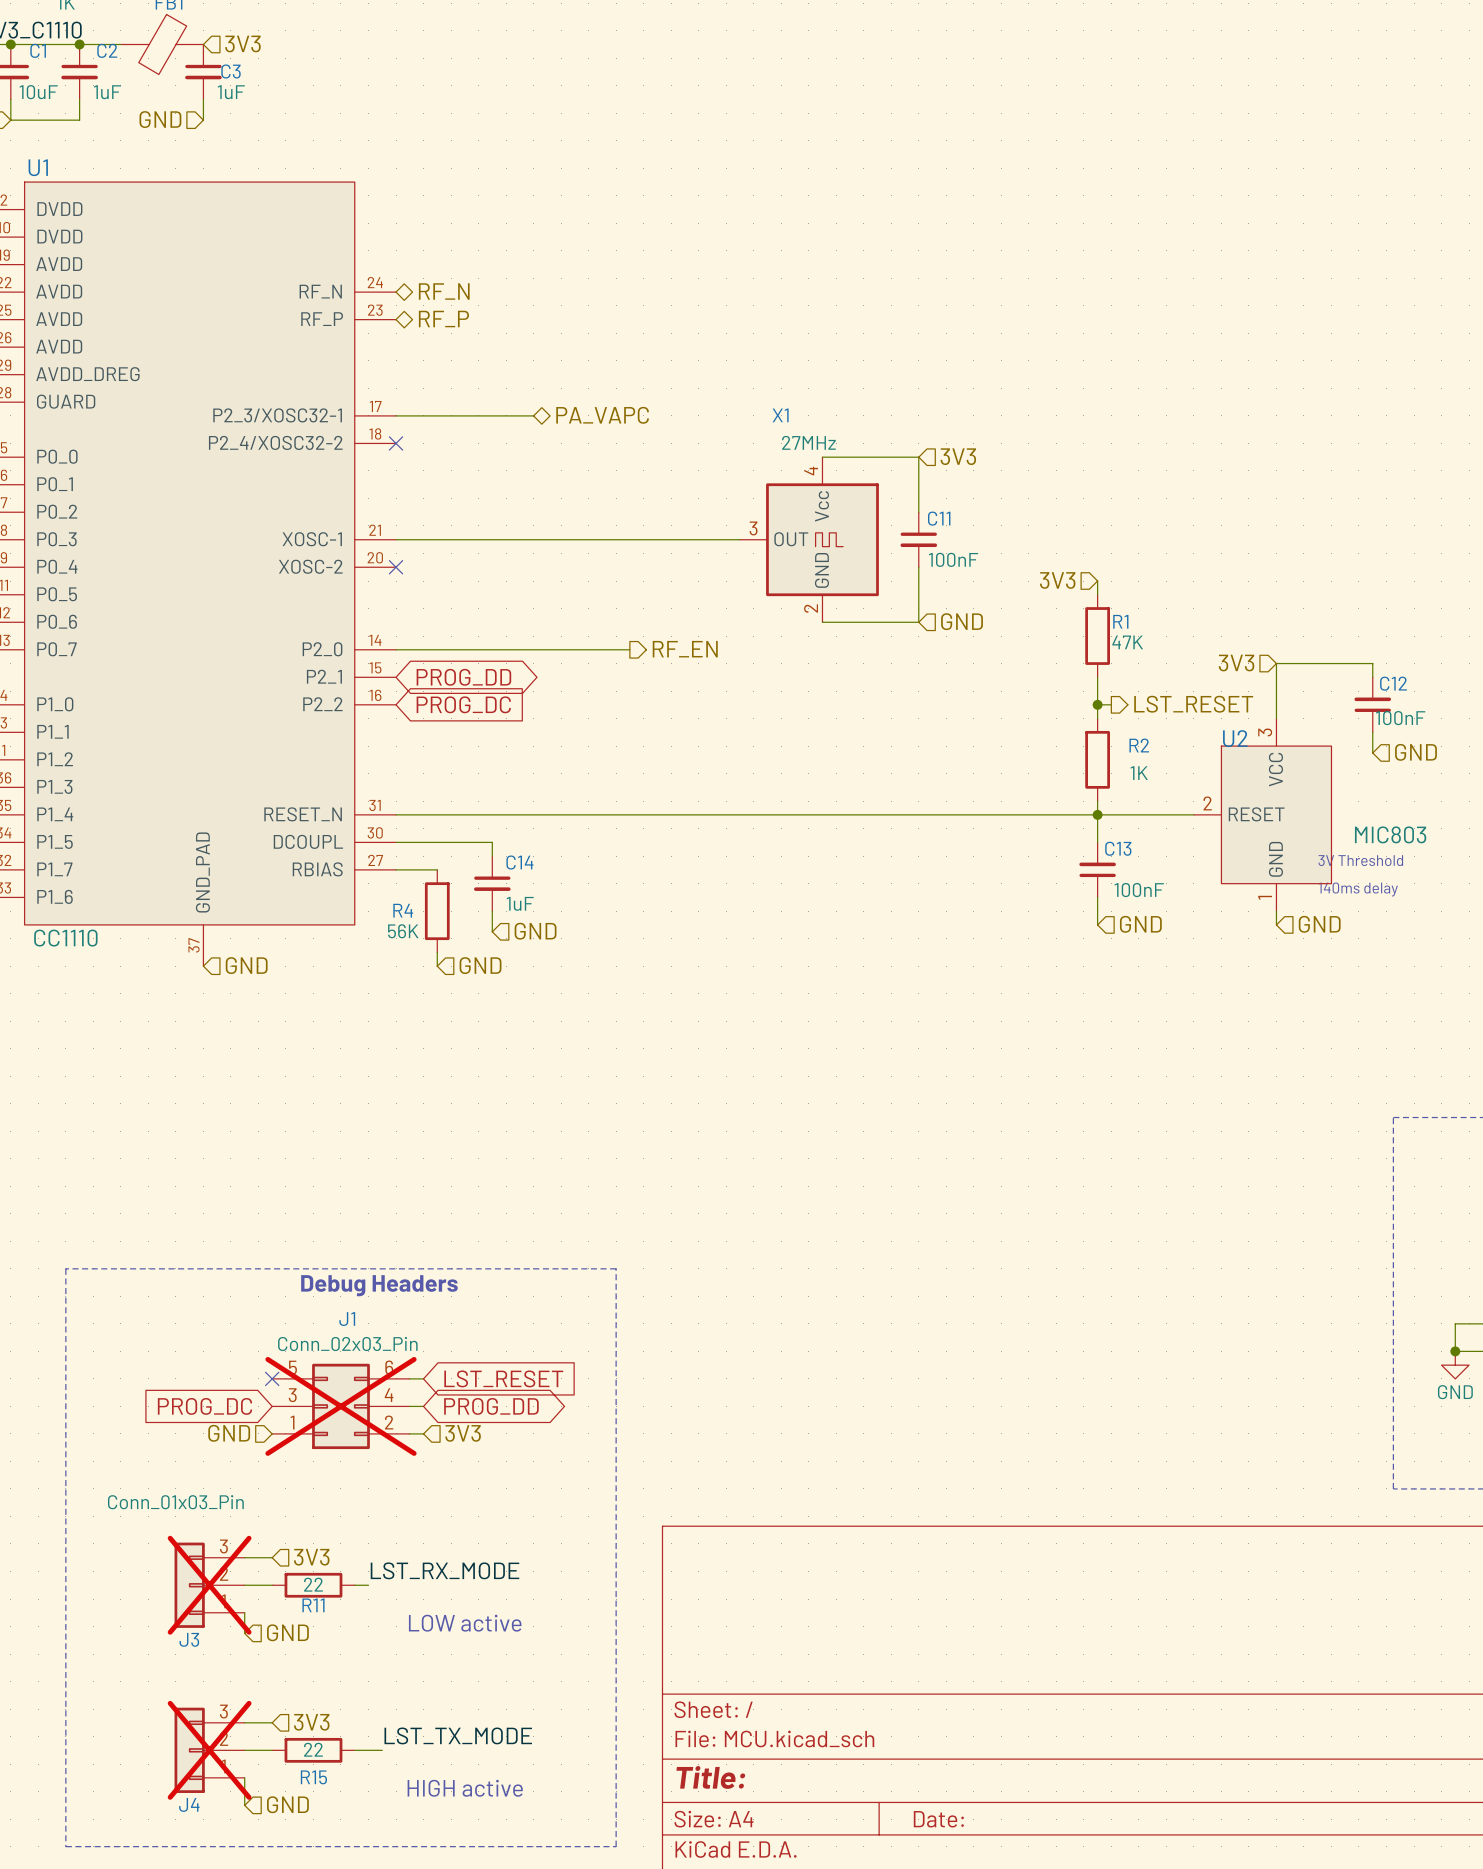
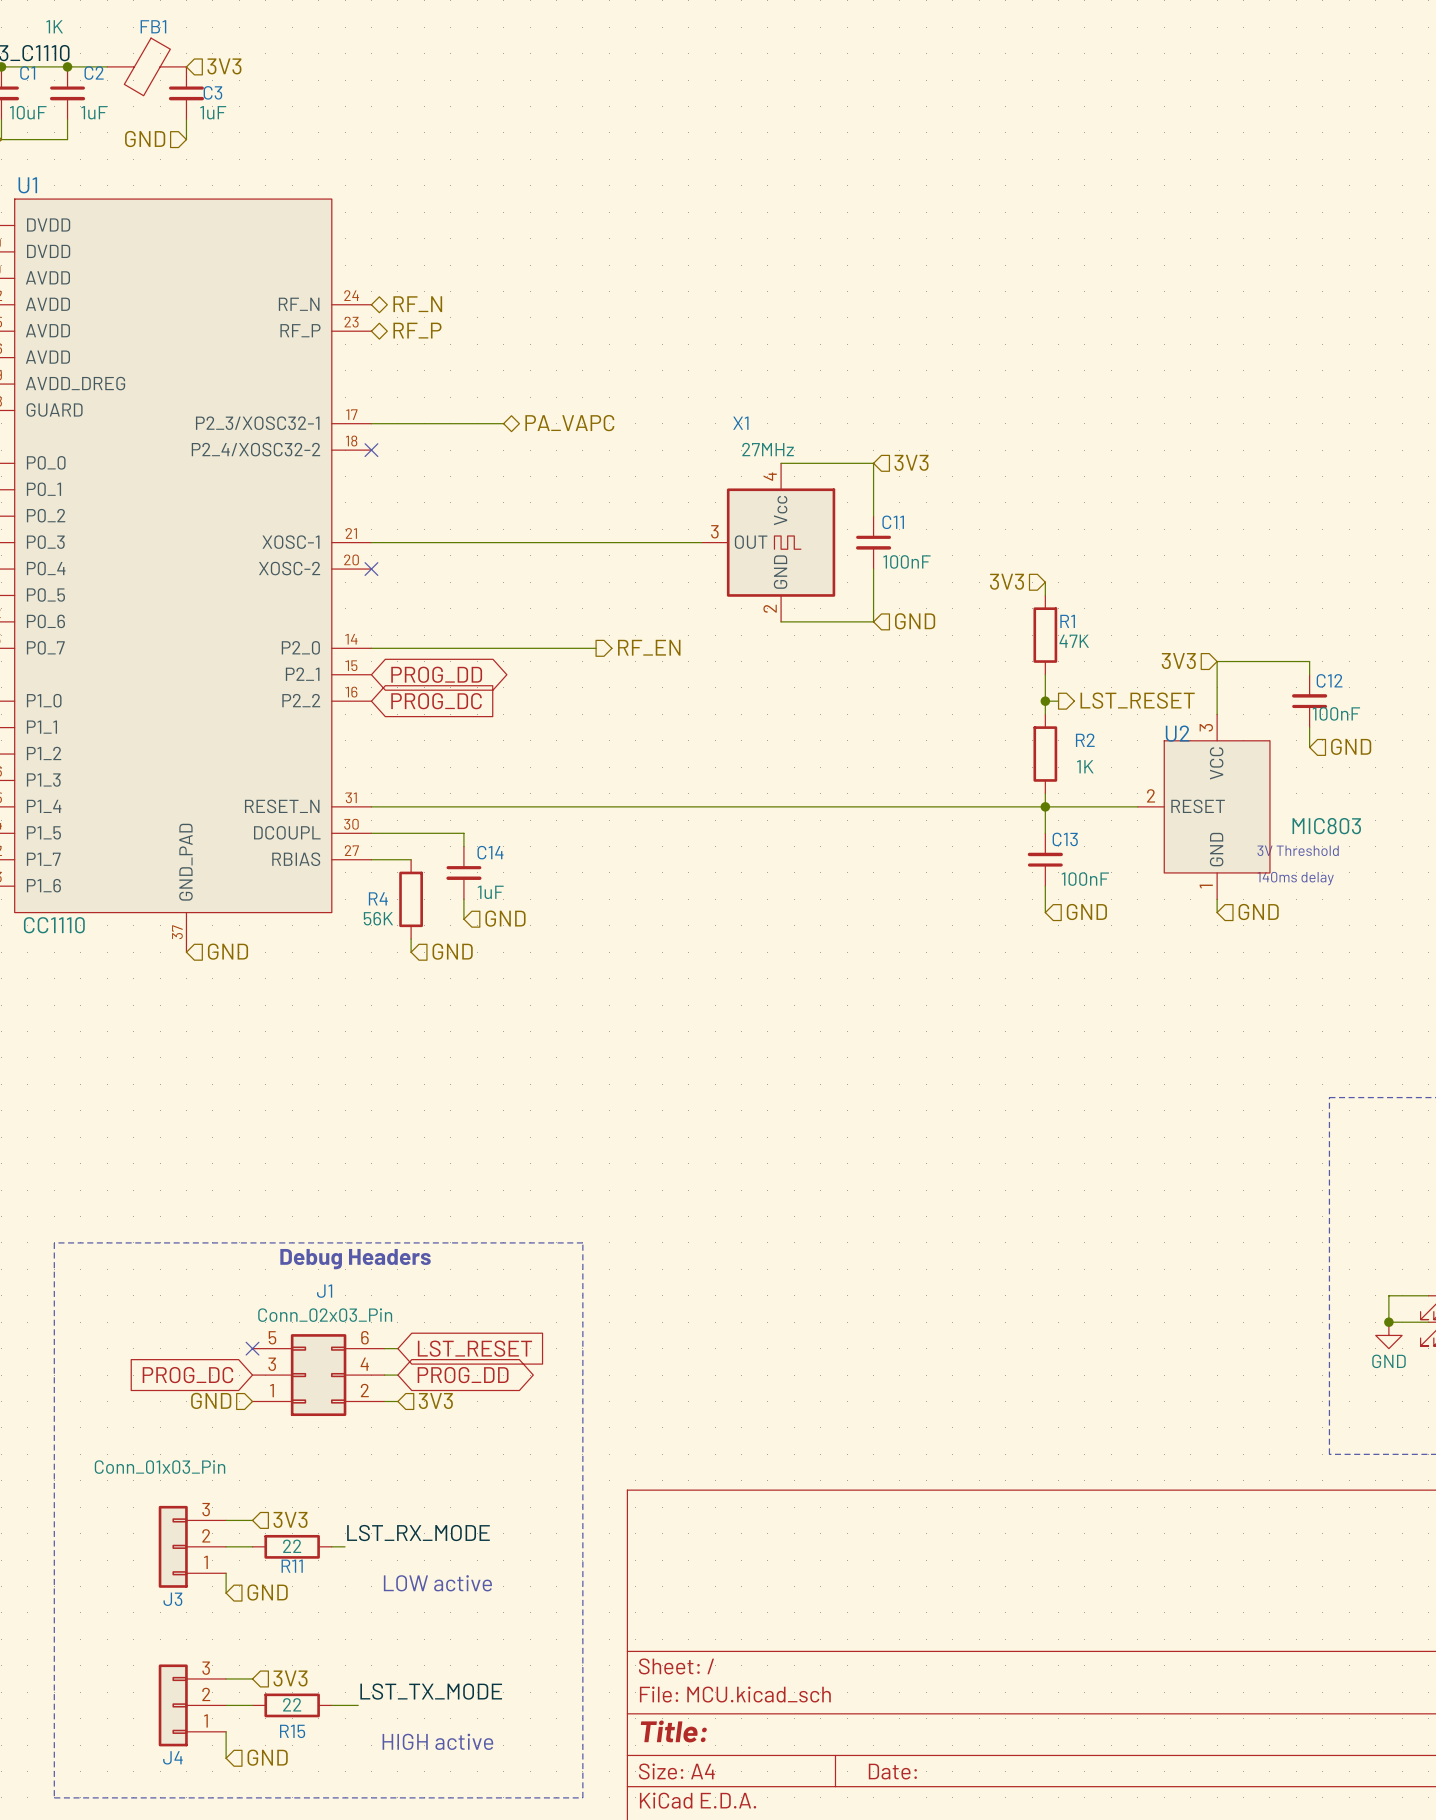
J1 do-not-place cross: (340, 1406) -> none
J3 do-not-place cross: (209, 1585) -> none
J4 do-not-place cross: (209, 1750) -> none

